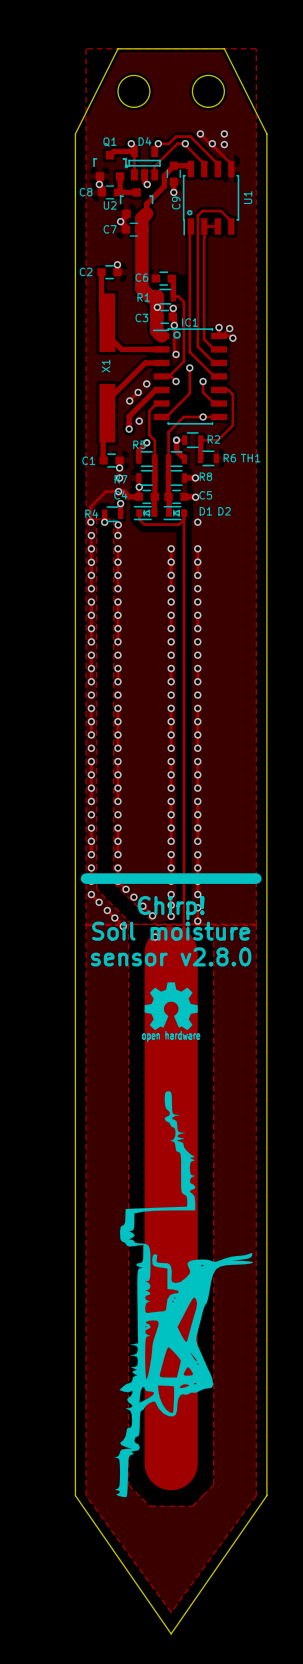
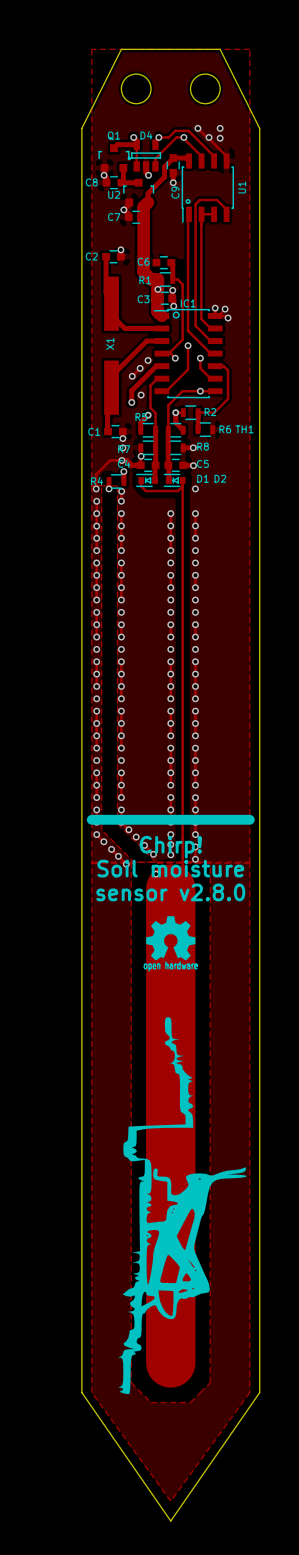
track: (174, 325) (174, 352) (176, 354) -> none
via: (176, 354) -> none

